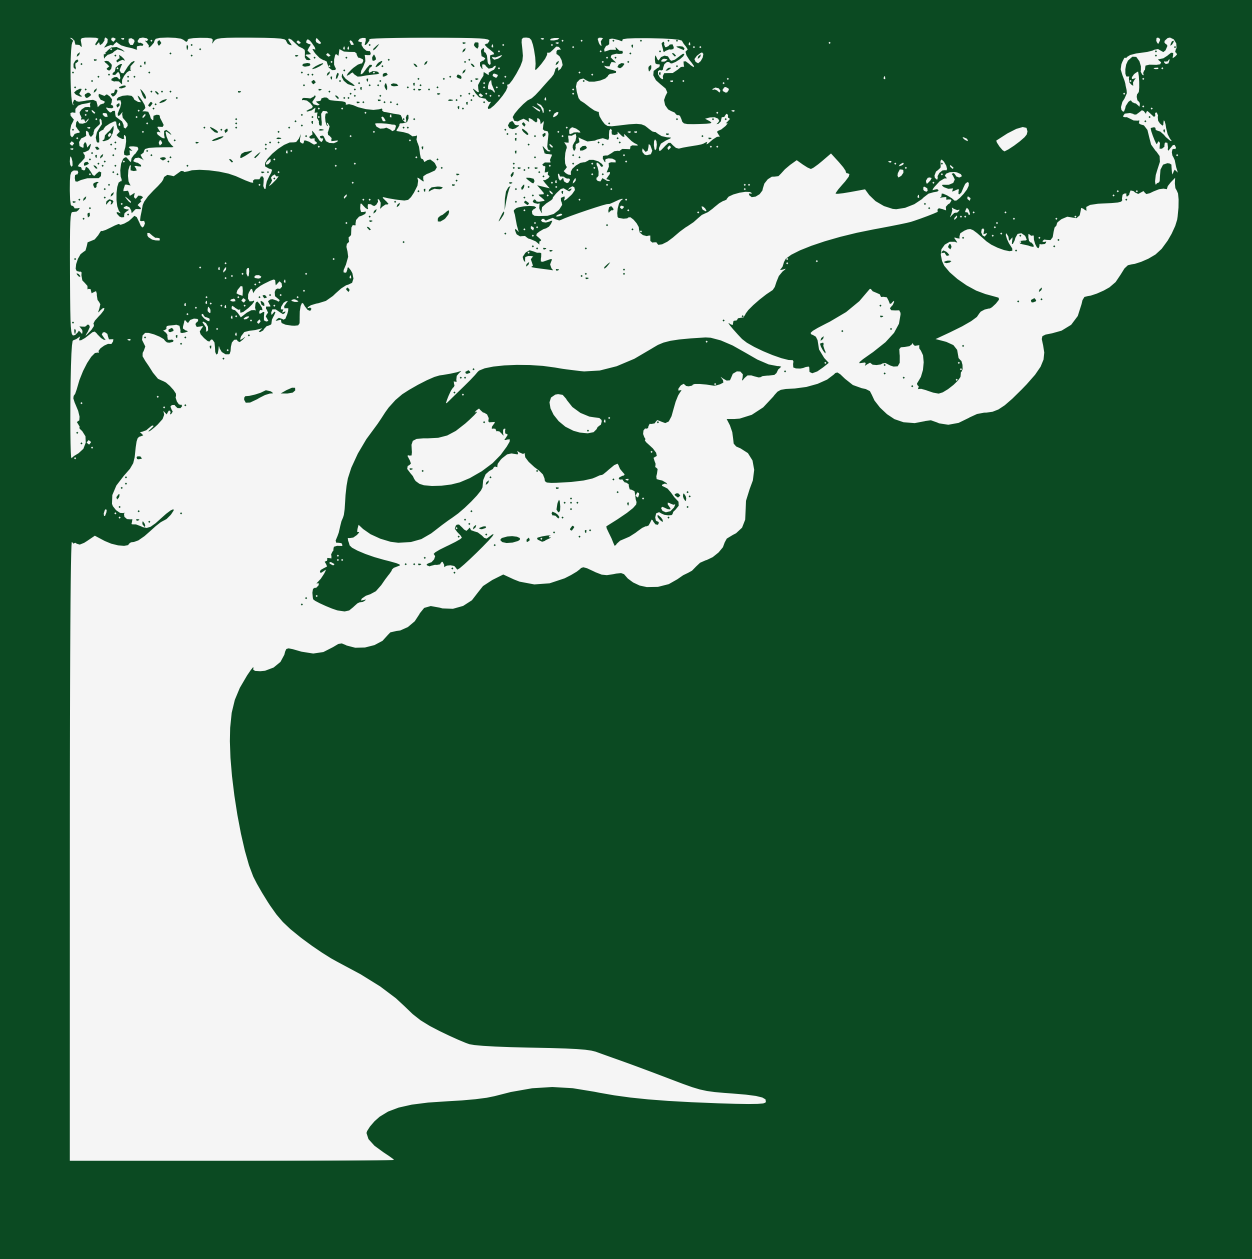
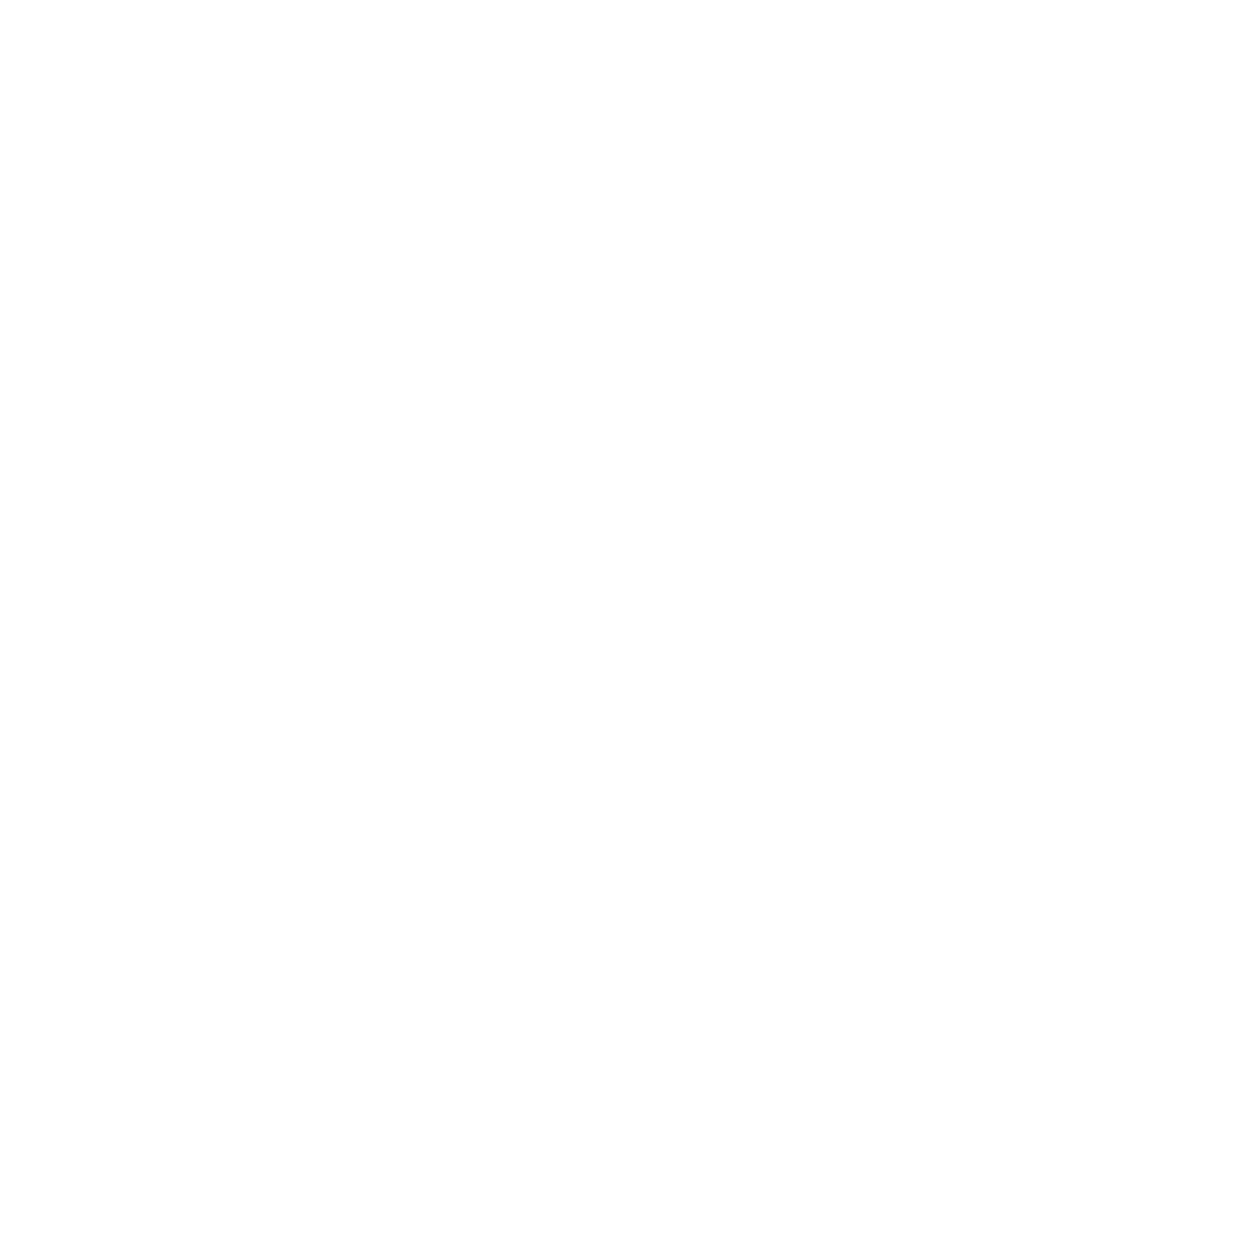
drawing: [69, 37, 1179, 1161] -> none

